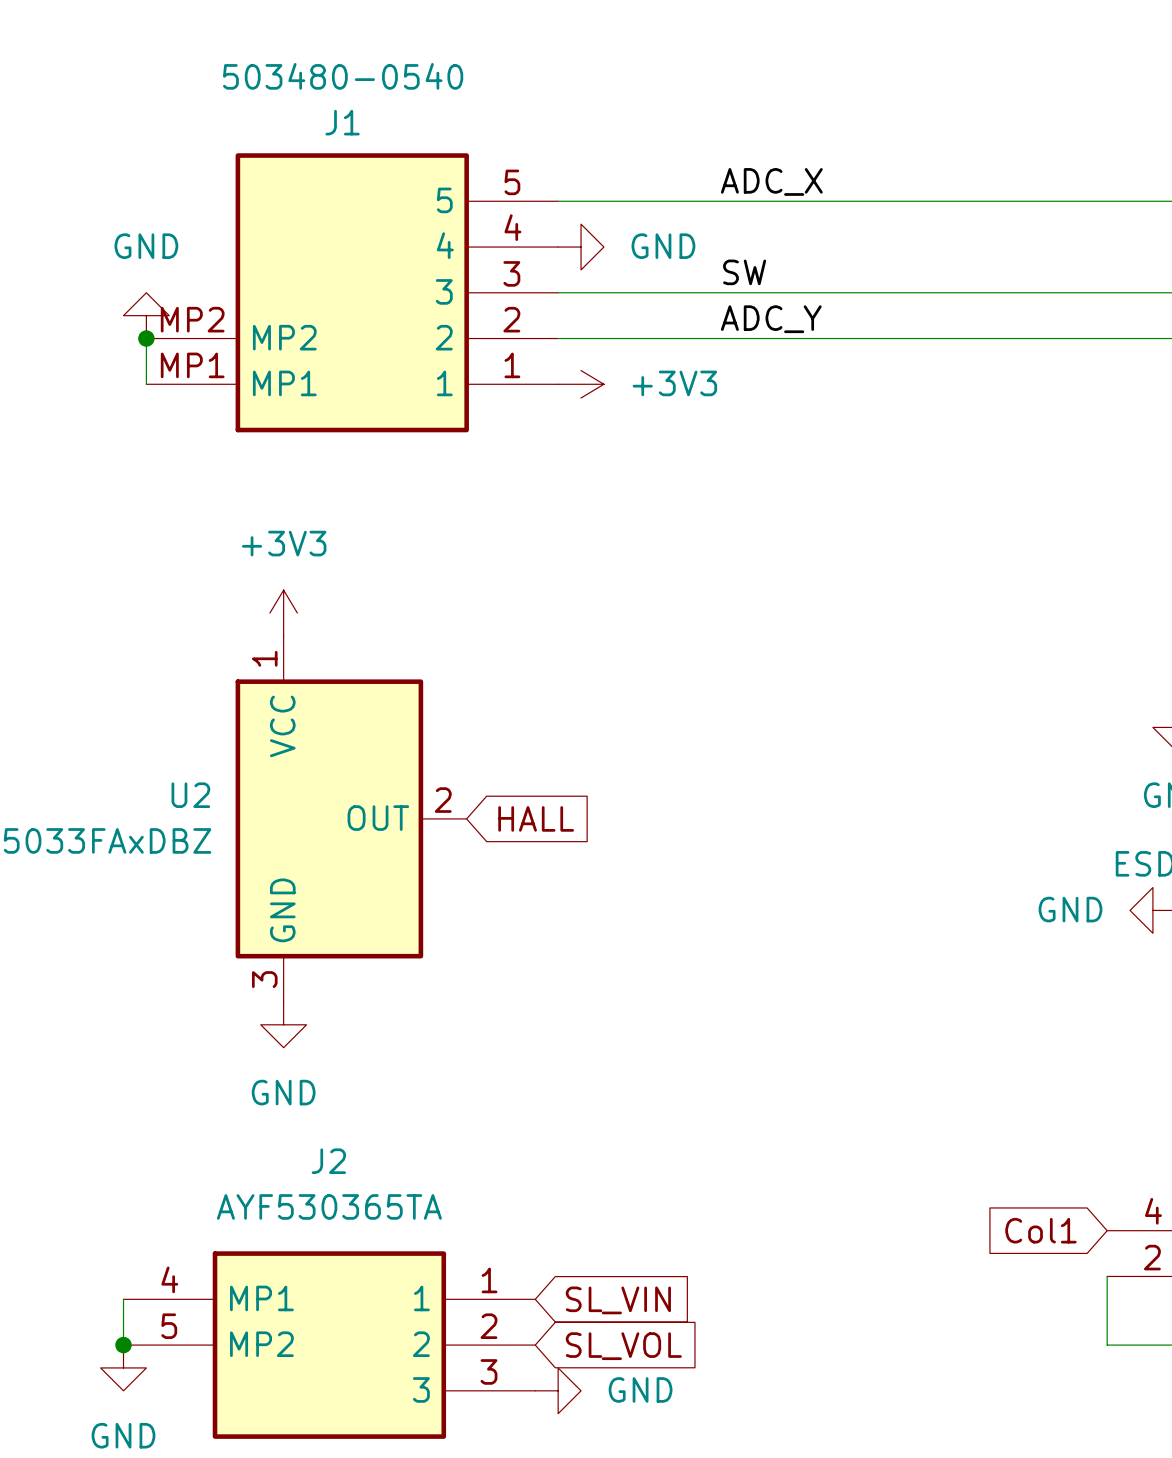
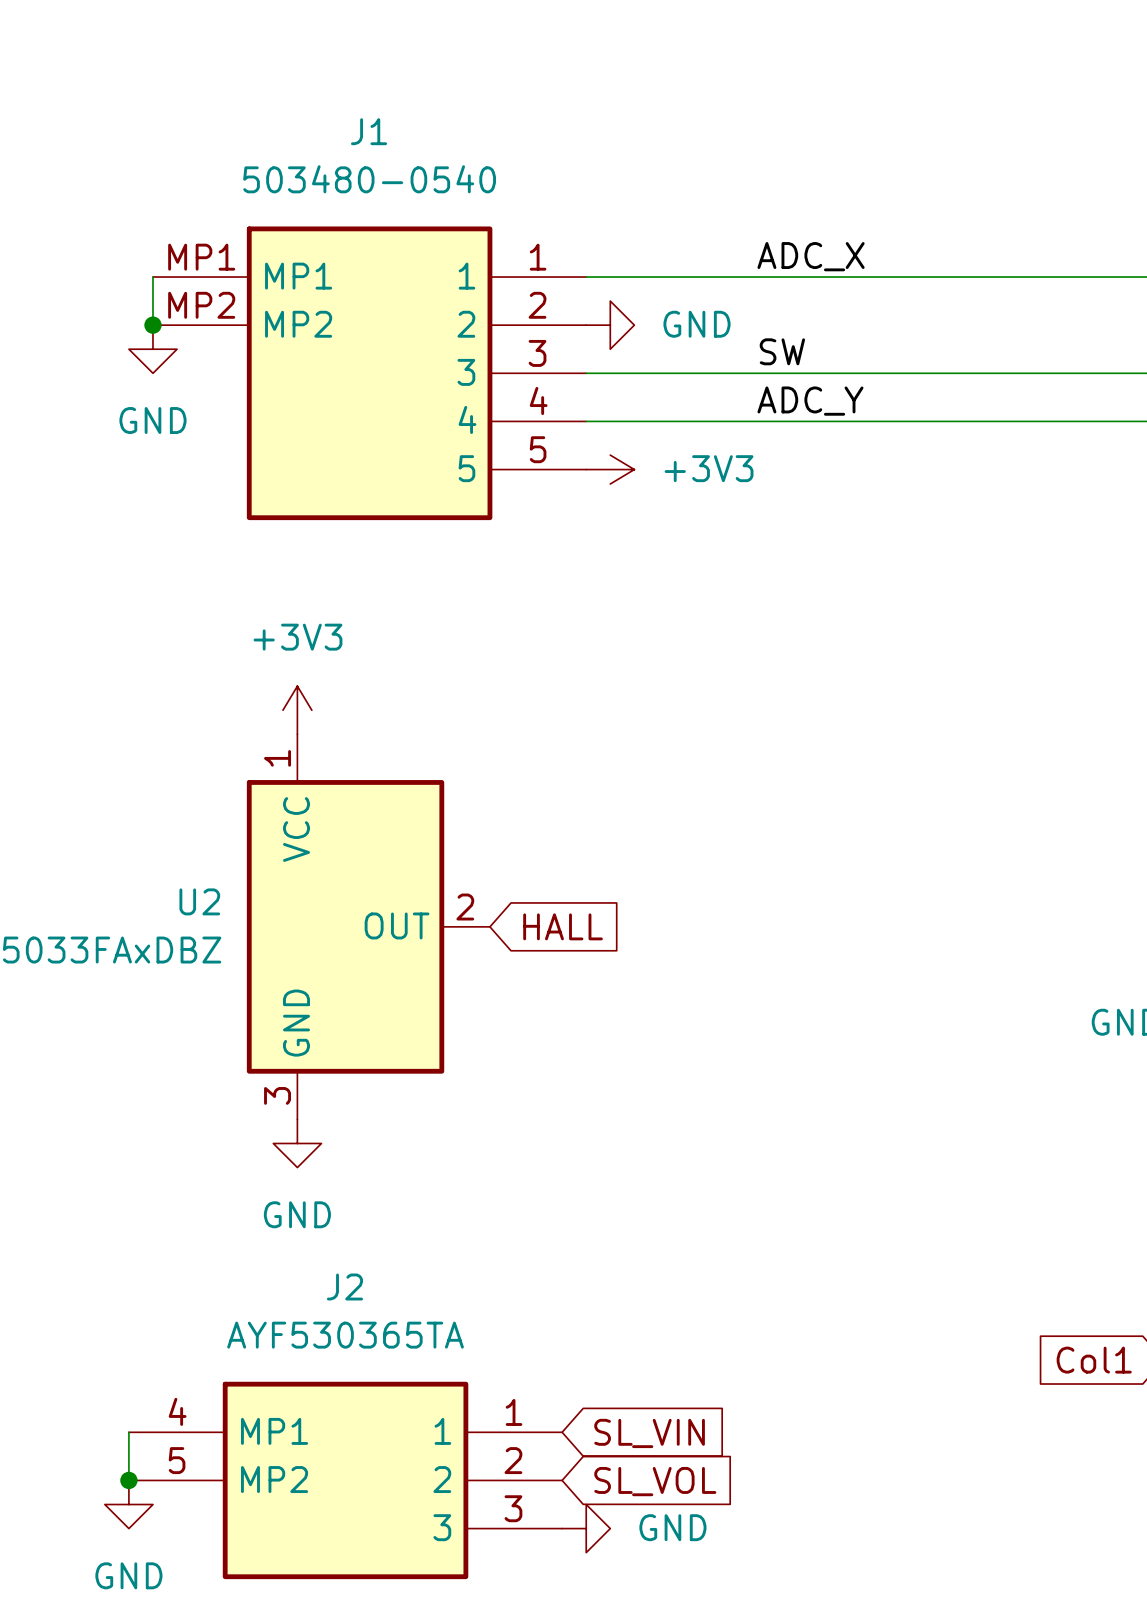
J1 name position: J1 (342, 122) -> J1 (369, 131)
J1 flip: as is (352, 292) -> up-down (369, 373)
power symbol rotation: 0° (146, 315) -> 180° (152, 349)
power symbol position: GND (146, 315) -> GND (152, 349)
wire: (146, 338) (146, 384) -> (152, 277) (152, 325)
junction position: (146, 338) -> (152, 325)

